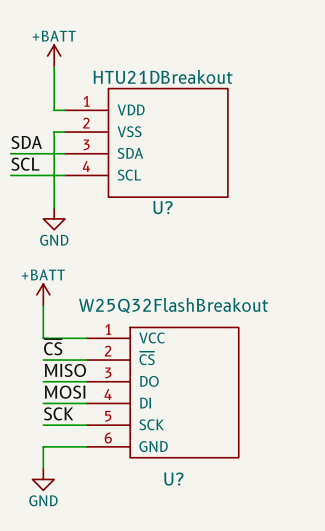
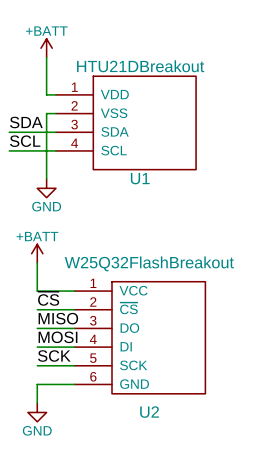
U? name: U? (162, 207) -> U1 (140, 178)
U? name: U? (173, 479) -> U2 (149, 412)

